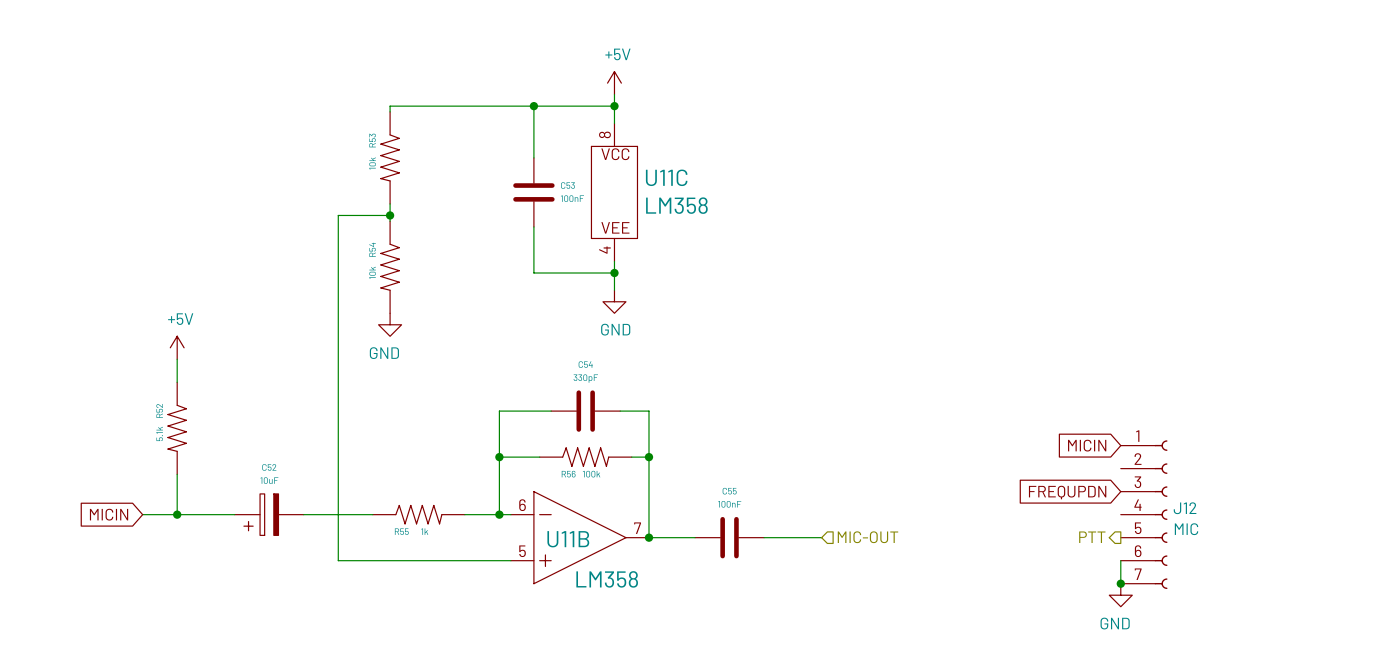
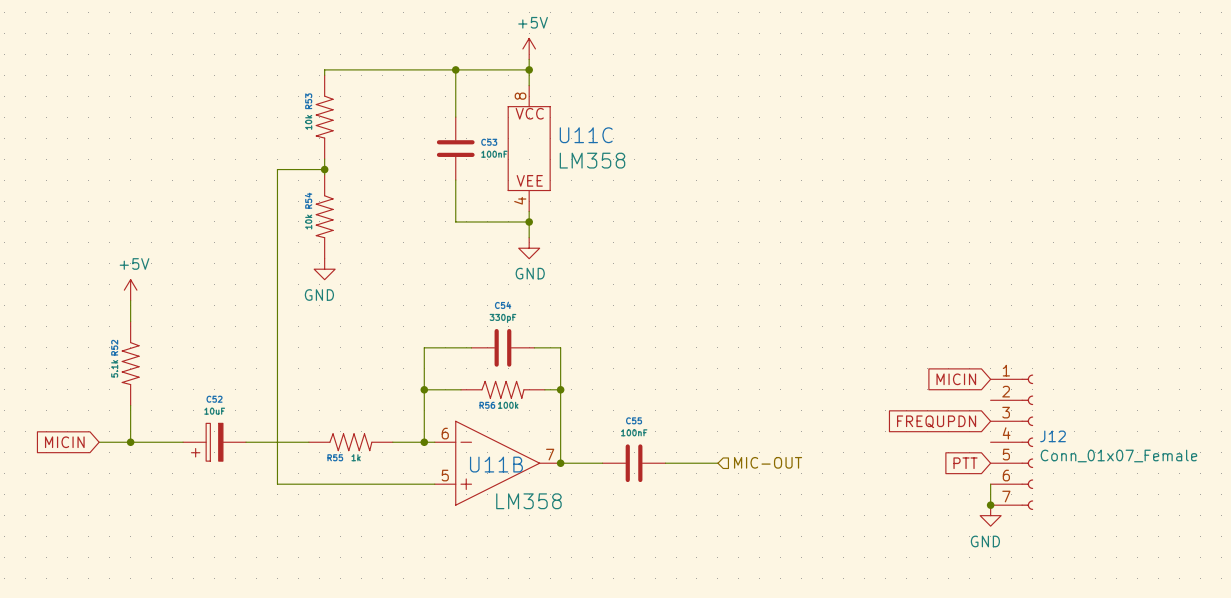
J12 value: MIC (1186, 529) -> Conn_01x07_Female (1118, 455)
hierarchical label: PTT (1092, 537) -> none
global label: none -> PTT (965, 463)

